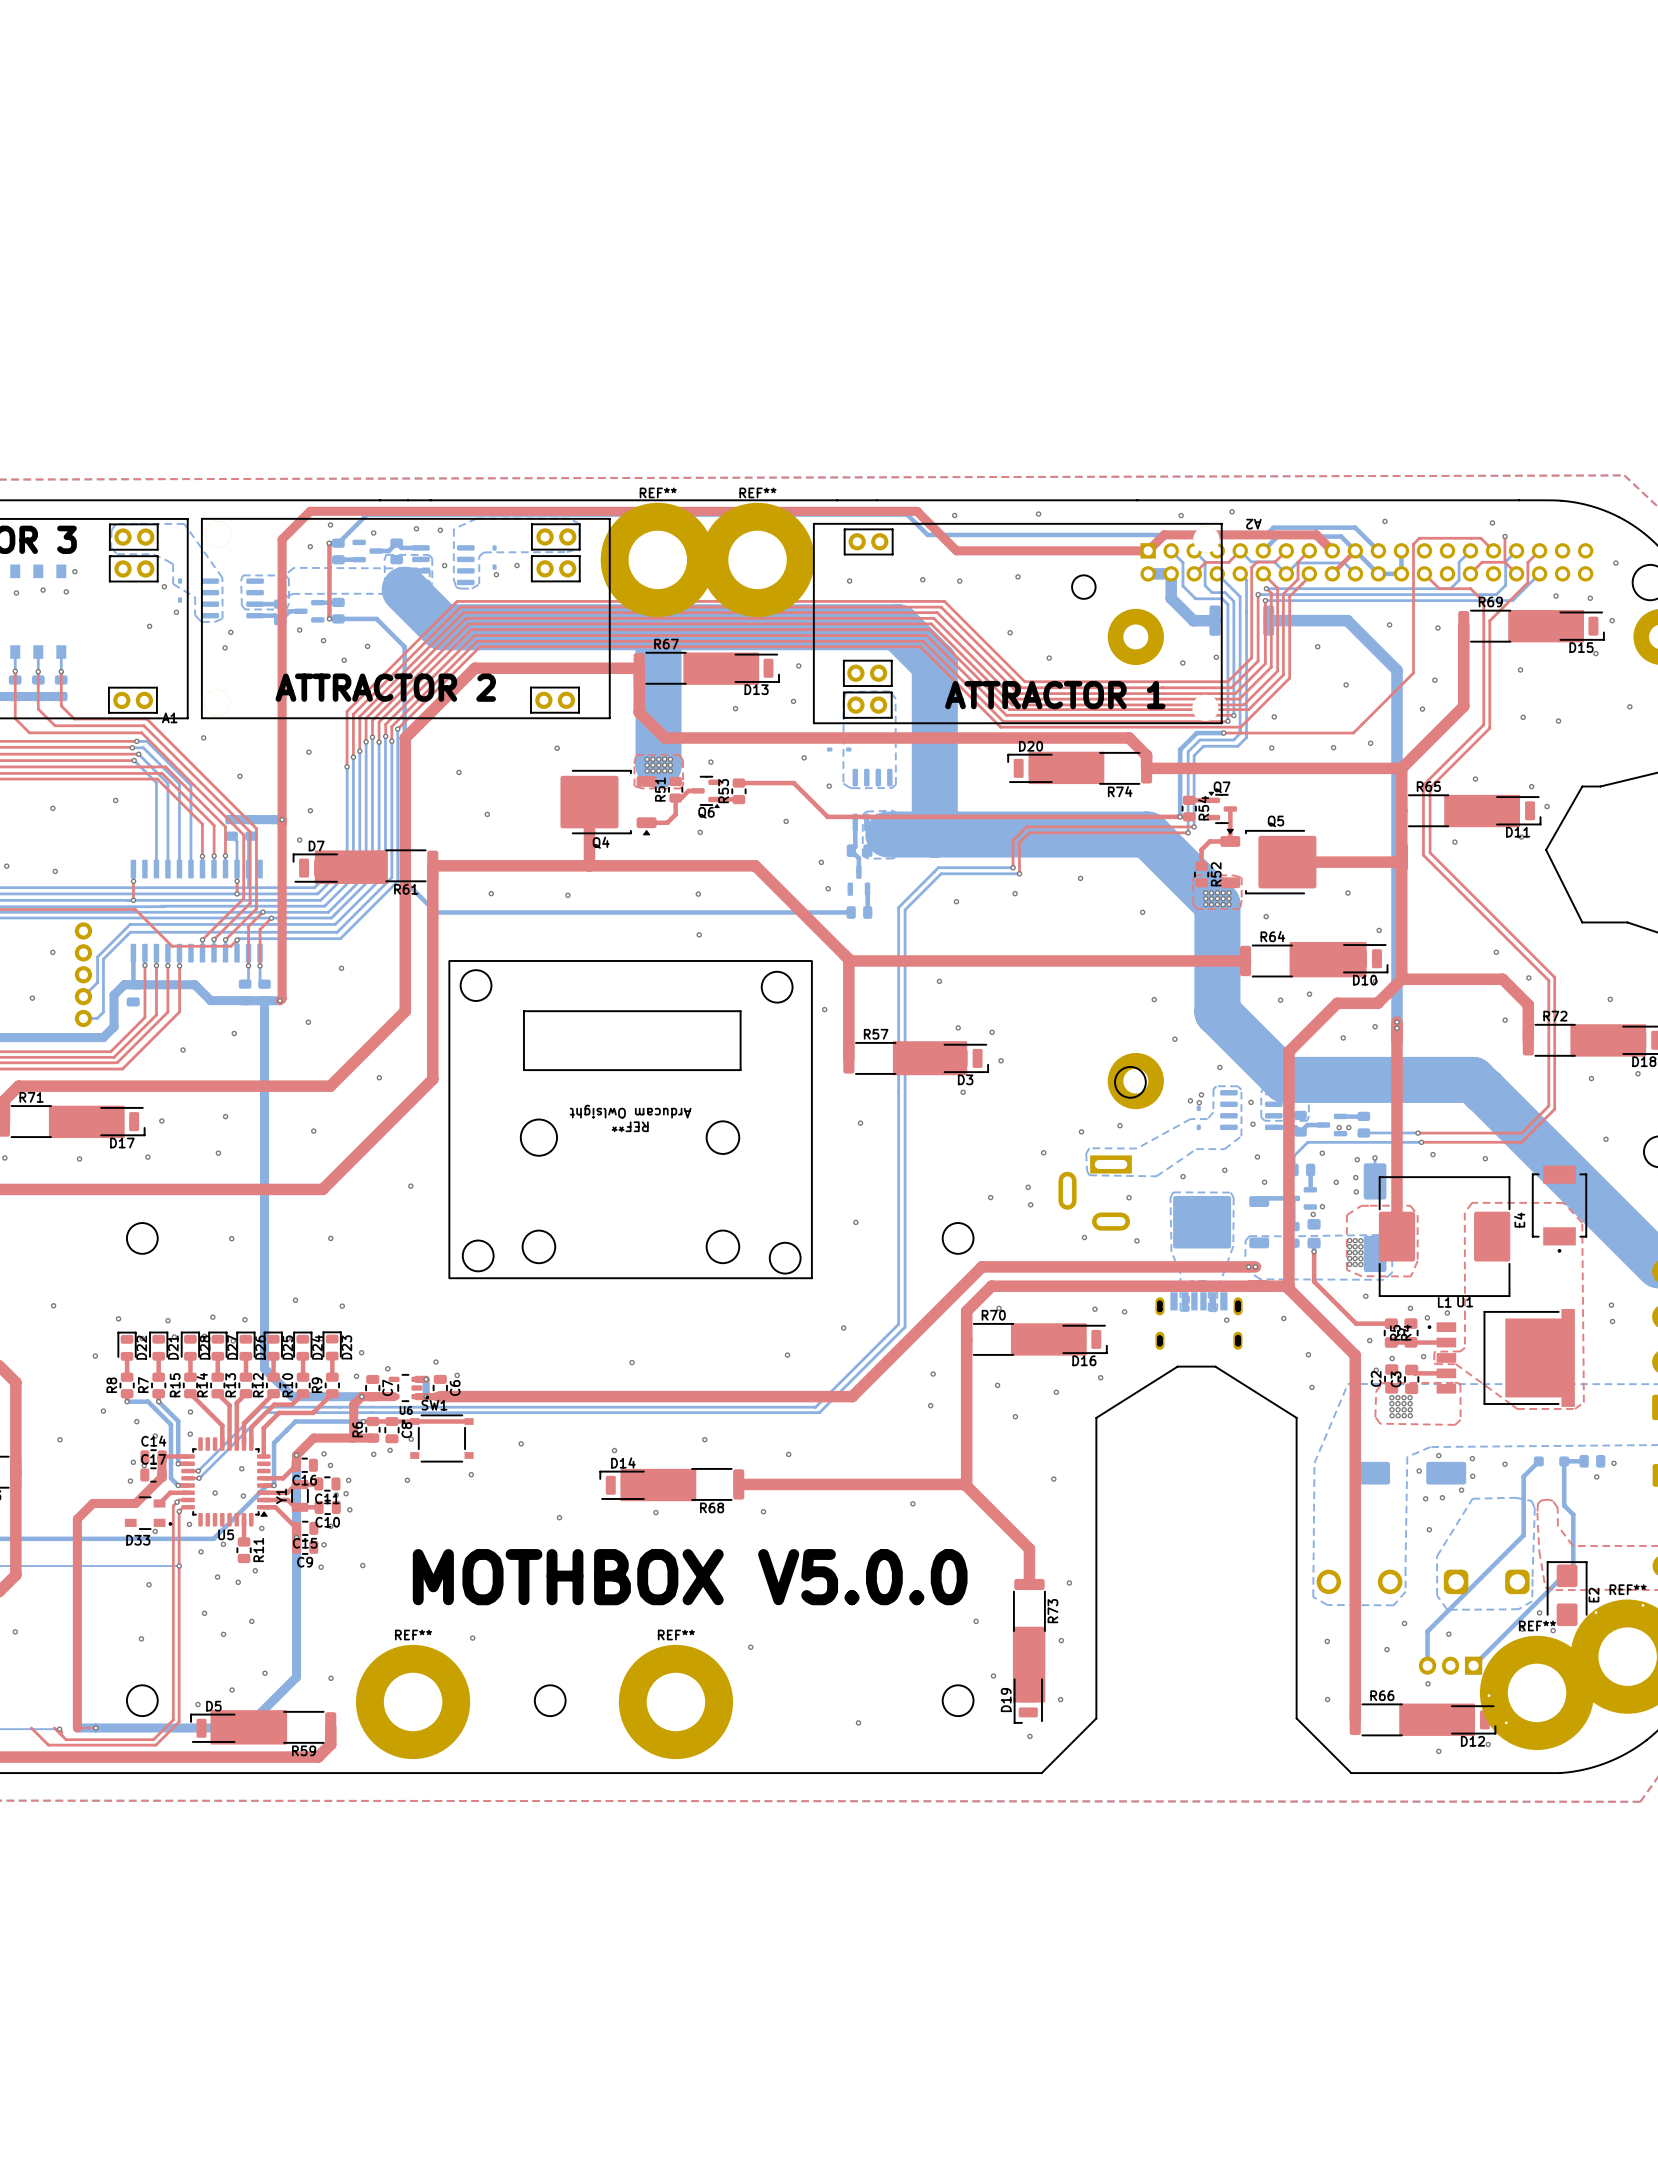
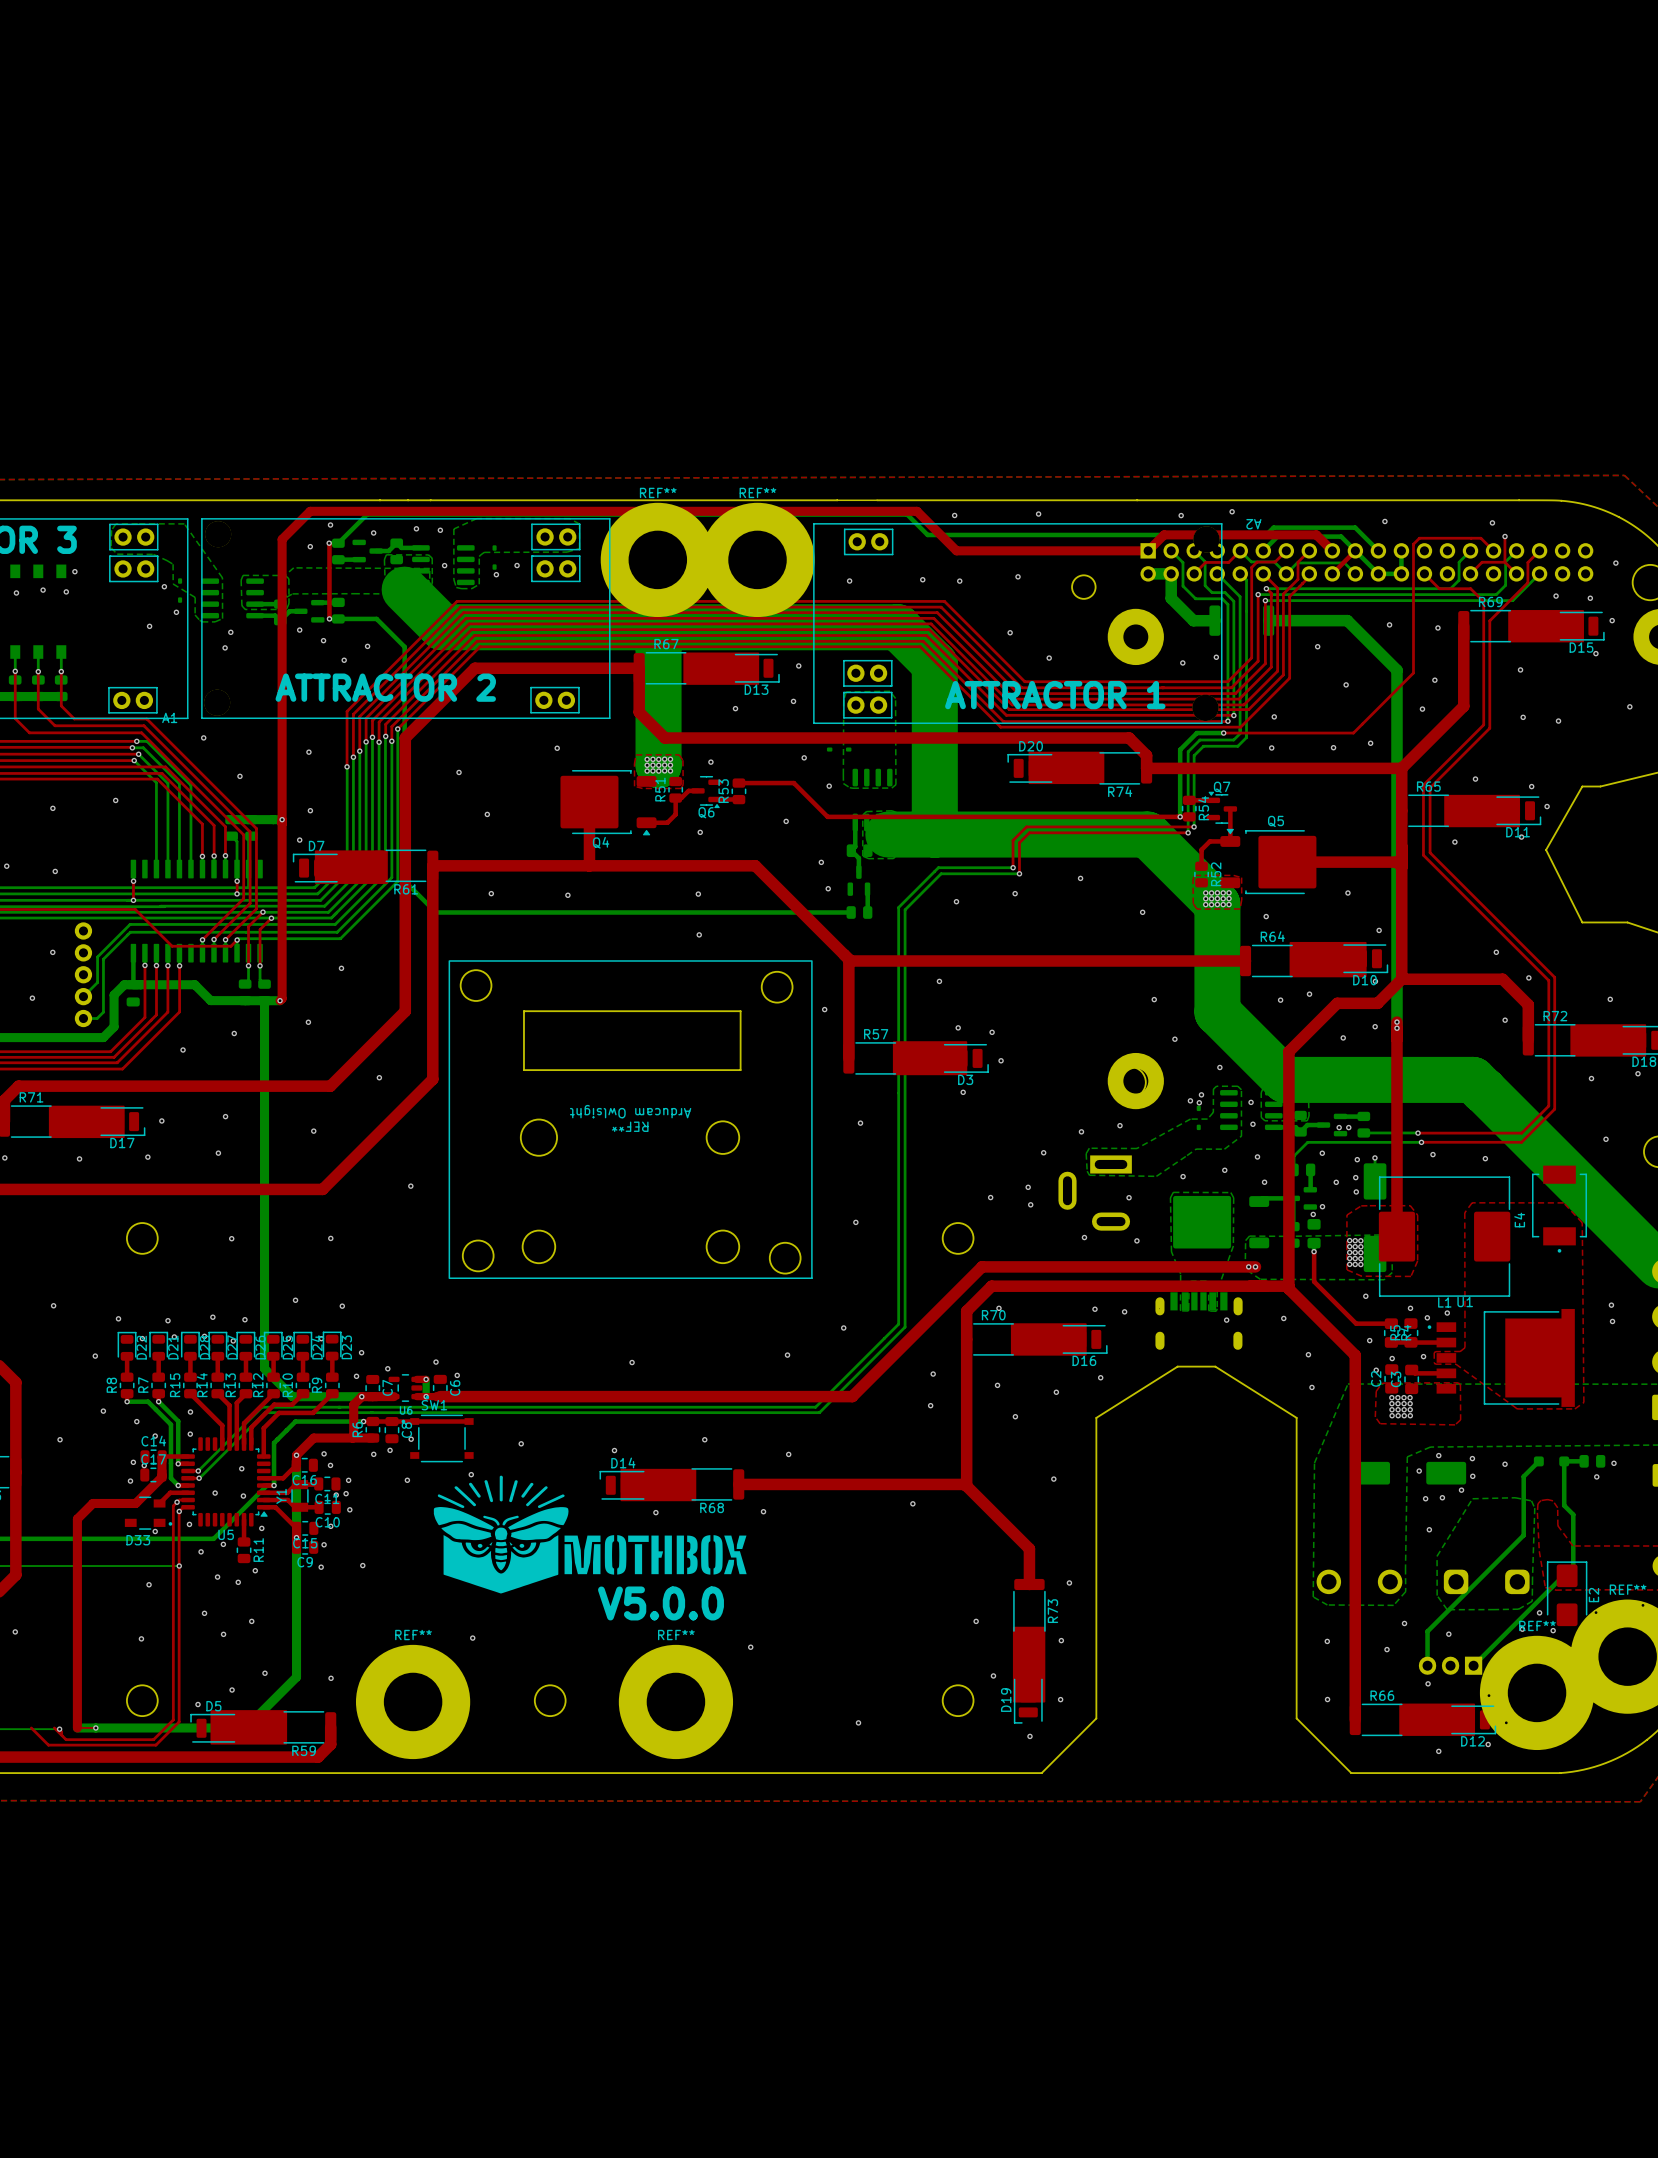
drawing: none -> [433, 1475, 747, 1594]
text: MOTHBOX V5.0.0 (690, 1577) -> none
text: none -> V5.0.0 (660, 1603)

